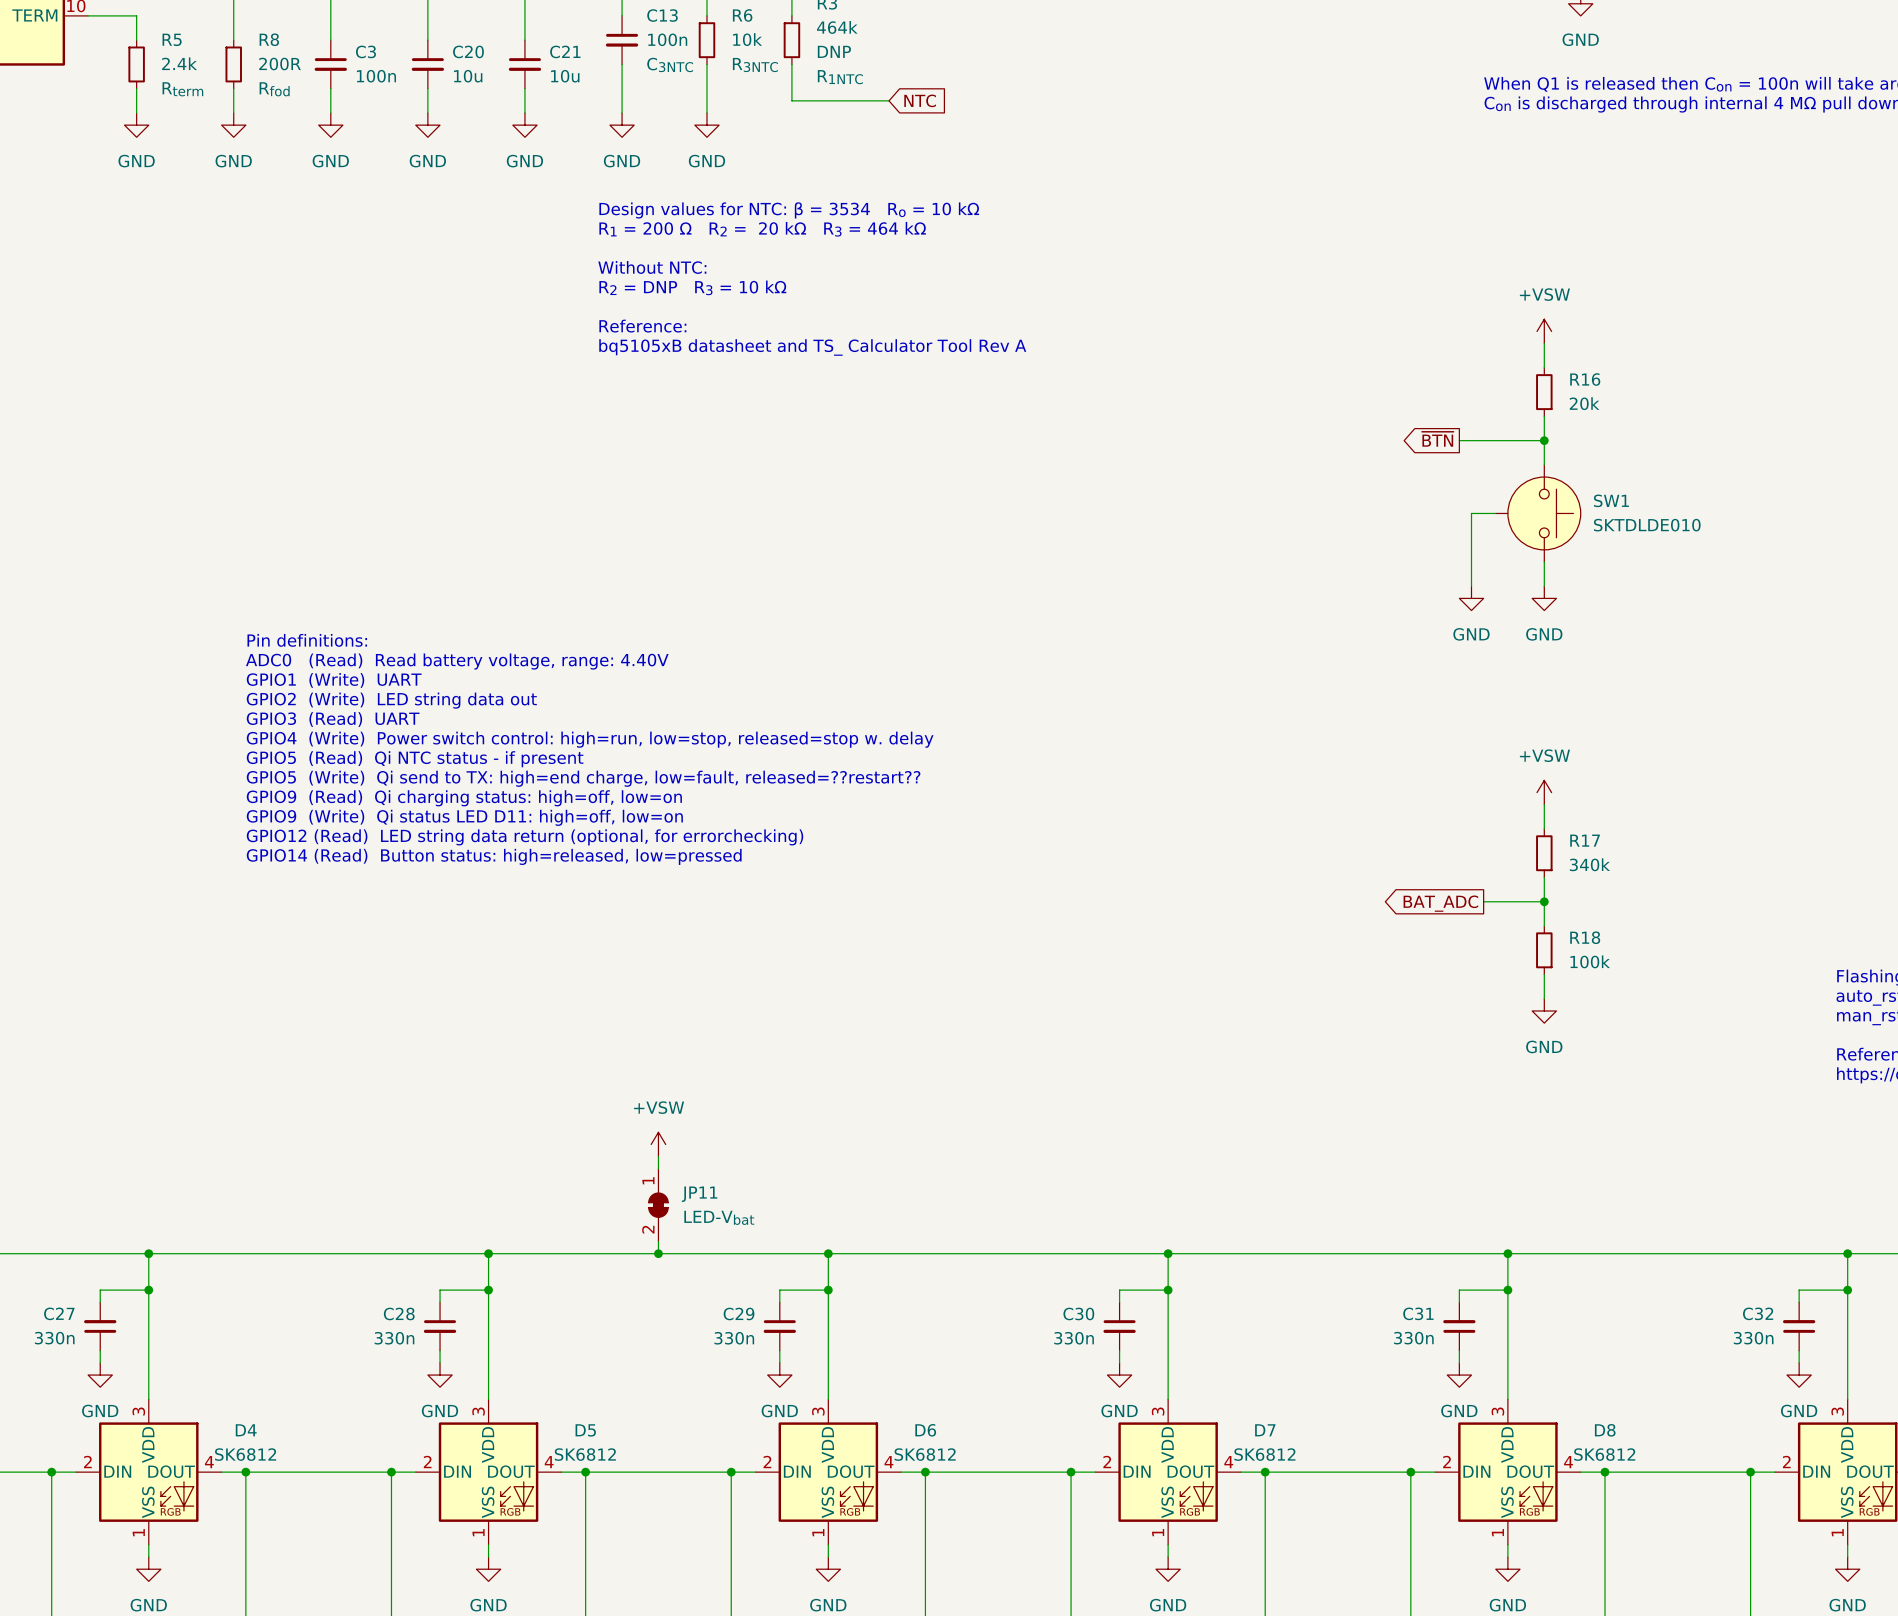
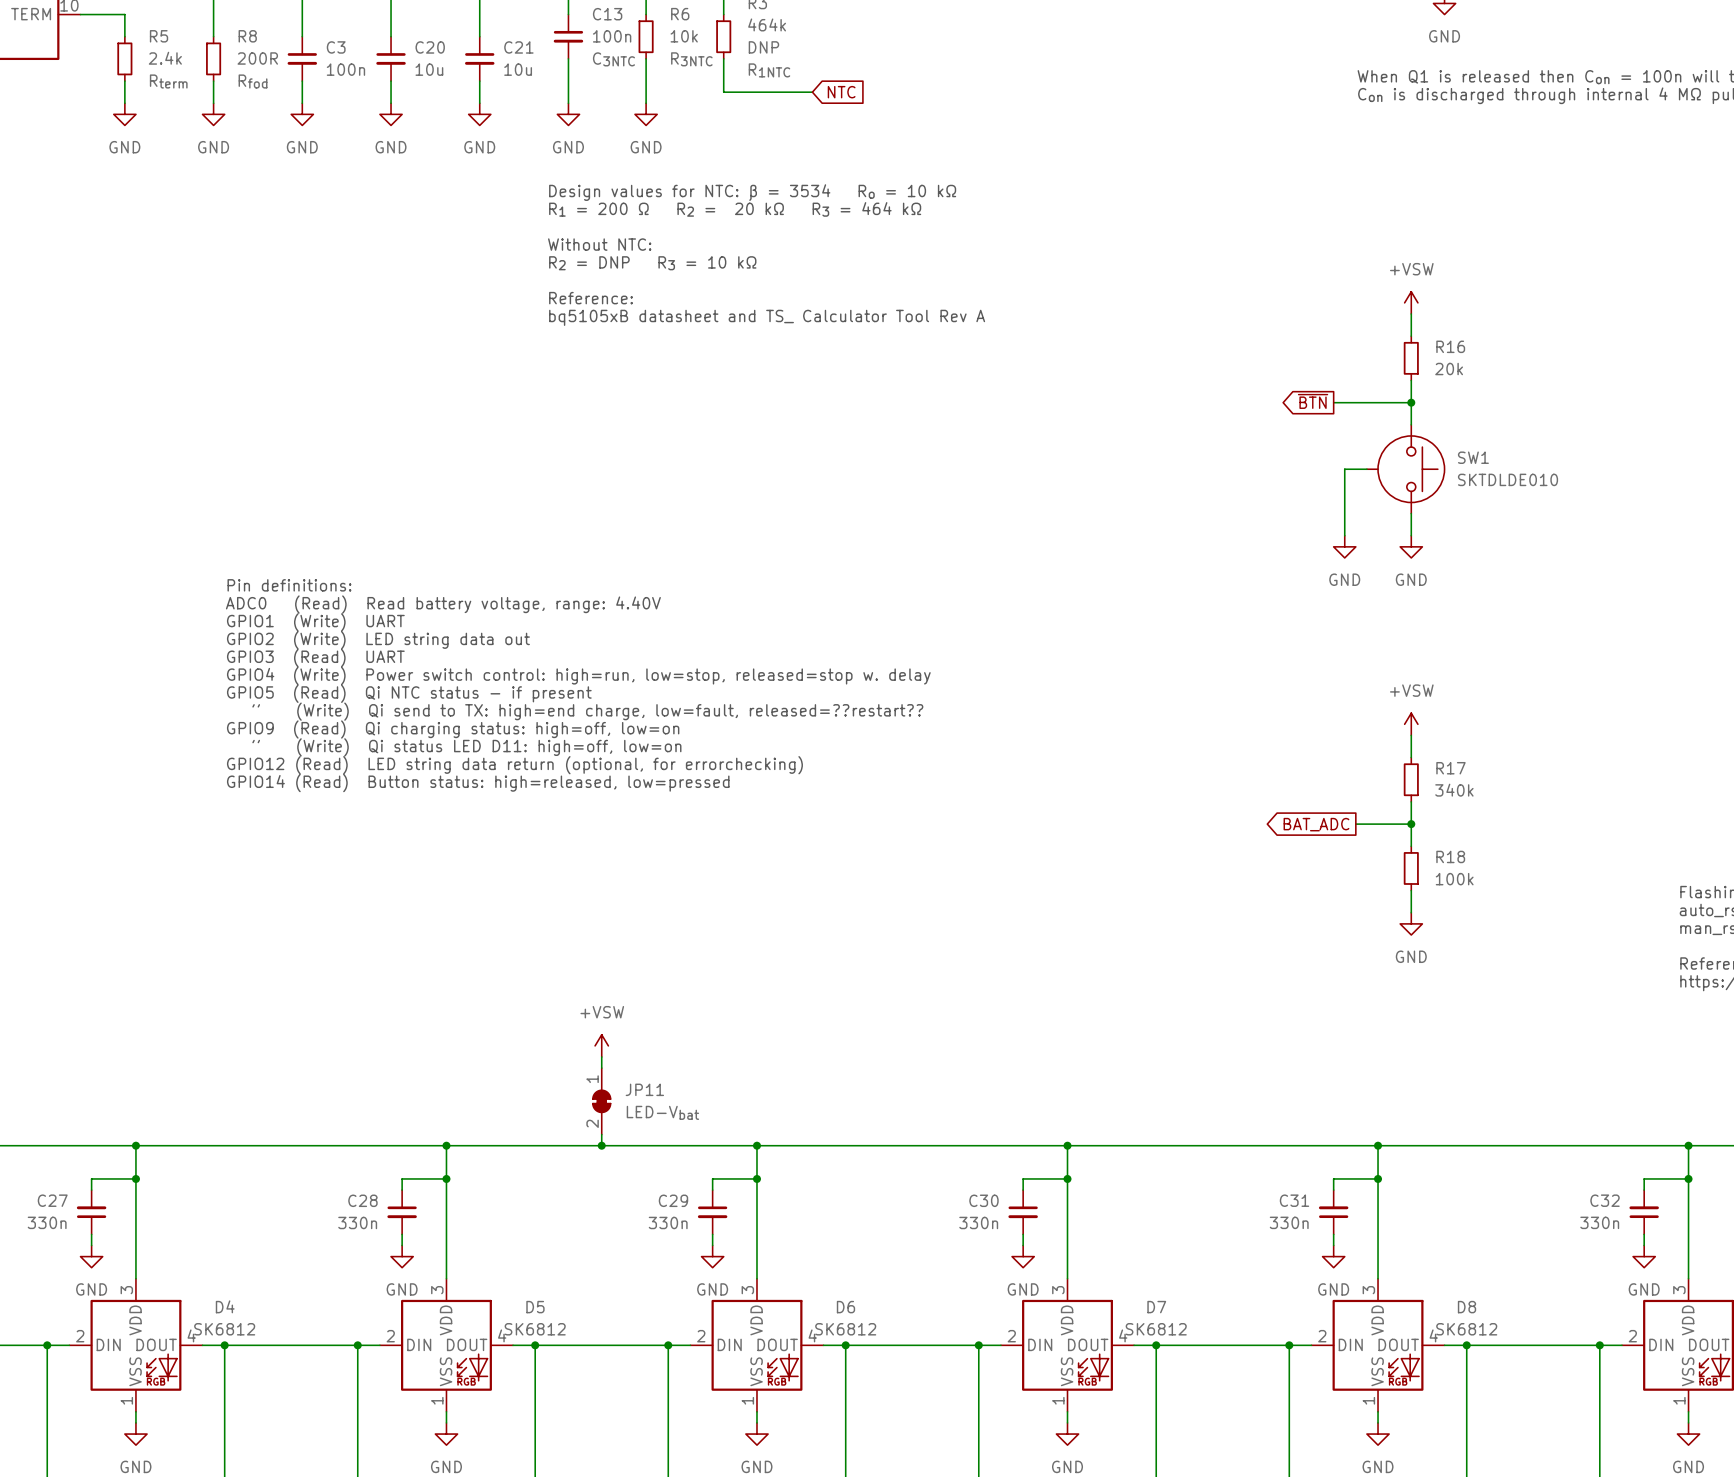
text: GPIO5 (Write) Qi send to TX: high=end charge, low=fault, released=??restart?? (583, 778) -> '' (Write) Qi send to TX: high=end charge, low=fault, released=??restart?? (587, 711)
text: GPIO9 (Write) Qi status LED D11: high=off, low=on (464, 817) -> '' (Write) Qi status LED D11: high=off, low=on (466, 747)

